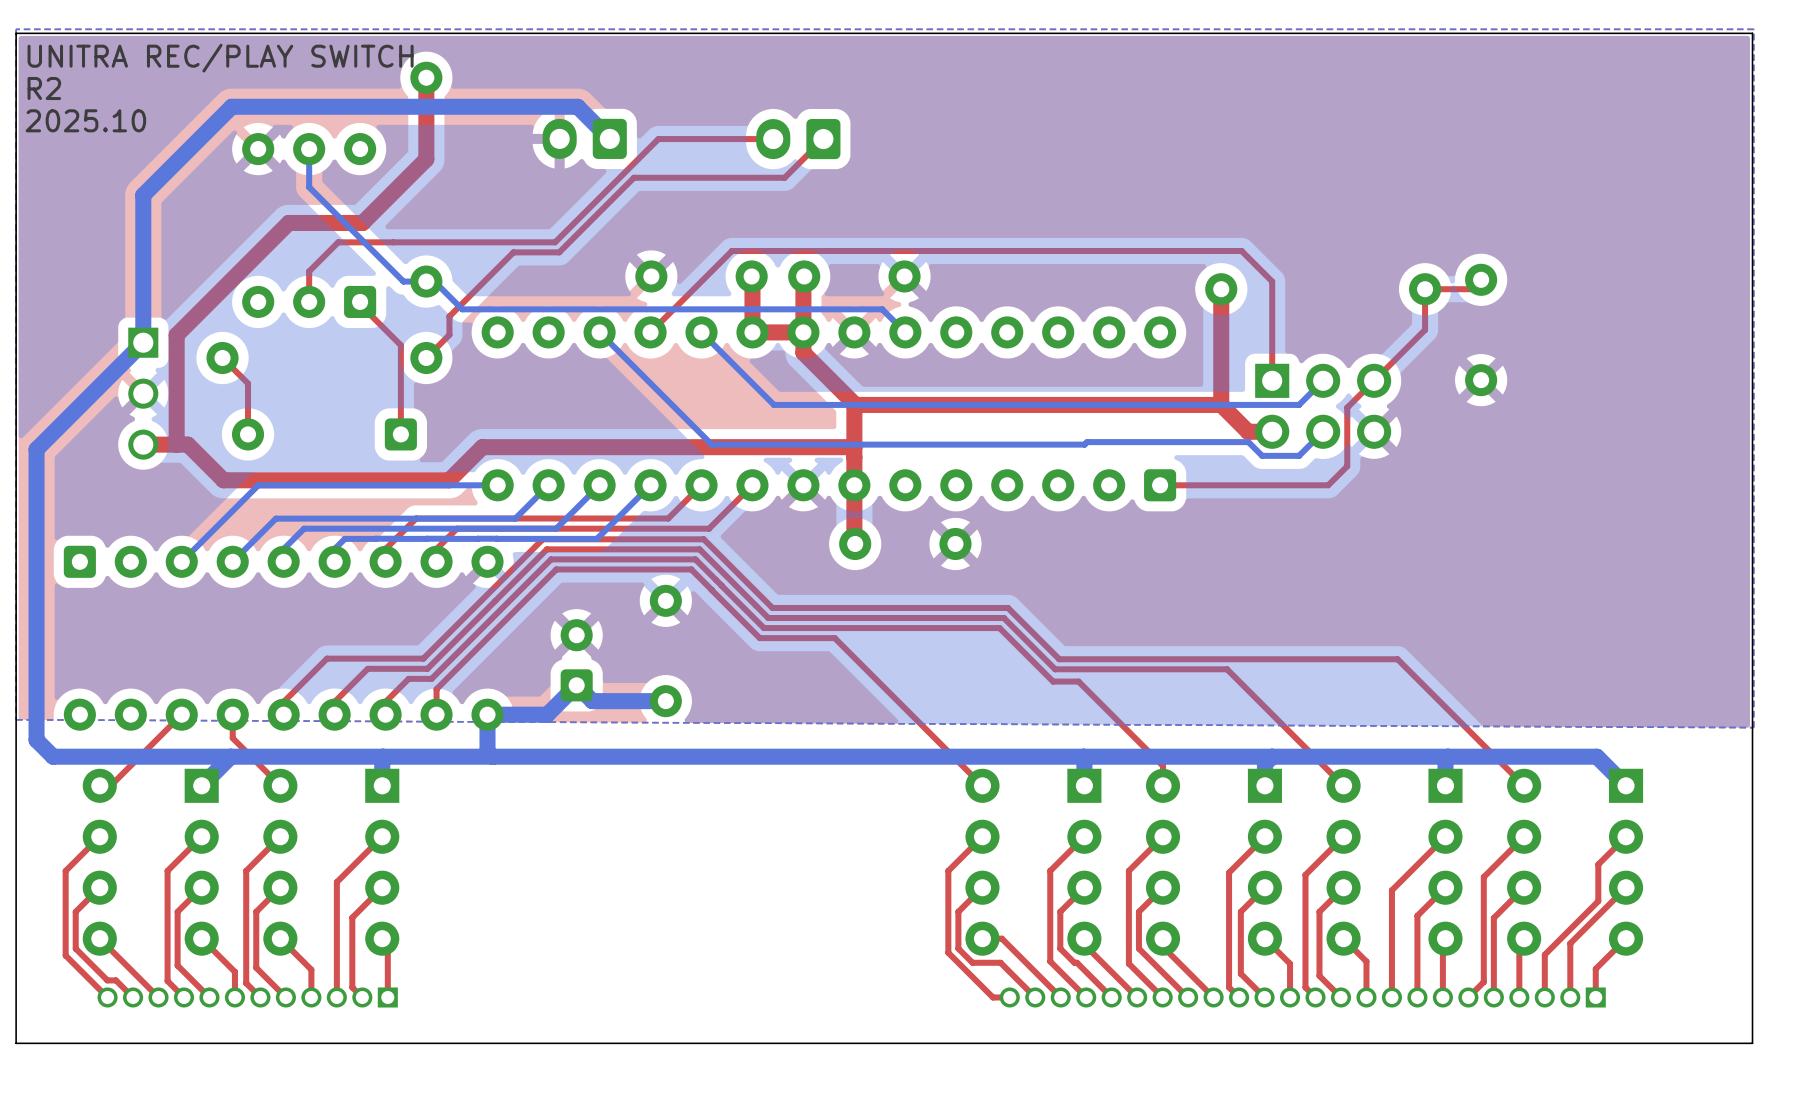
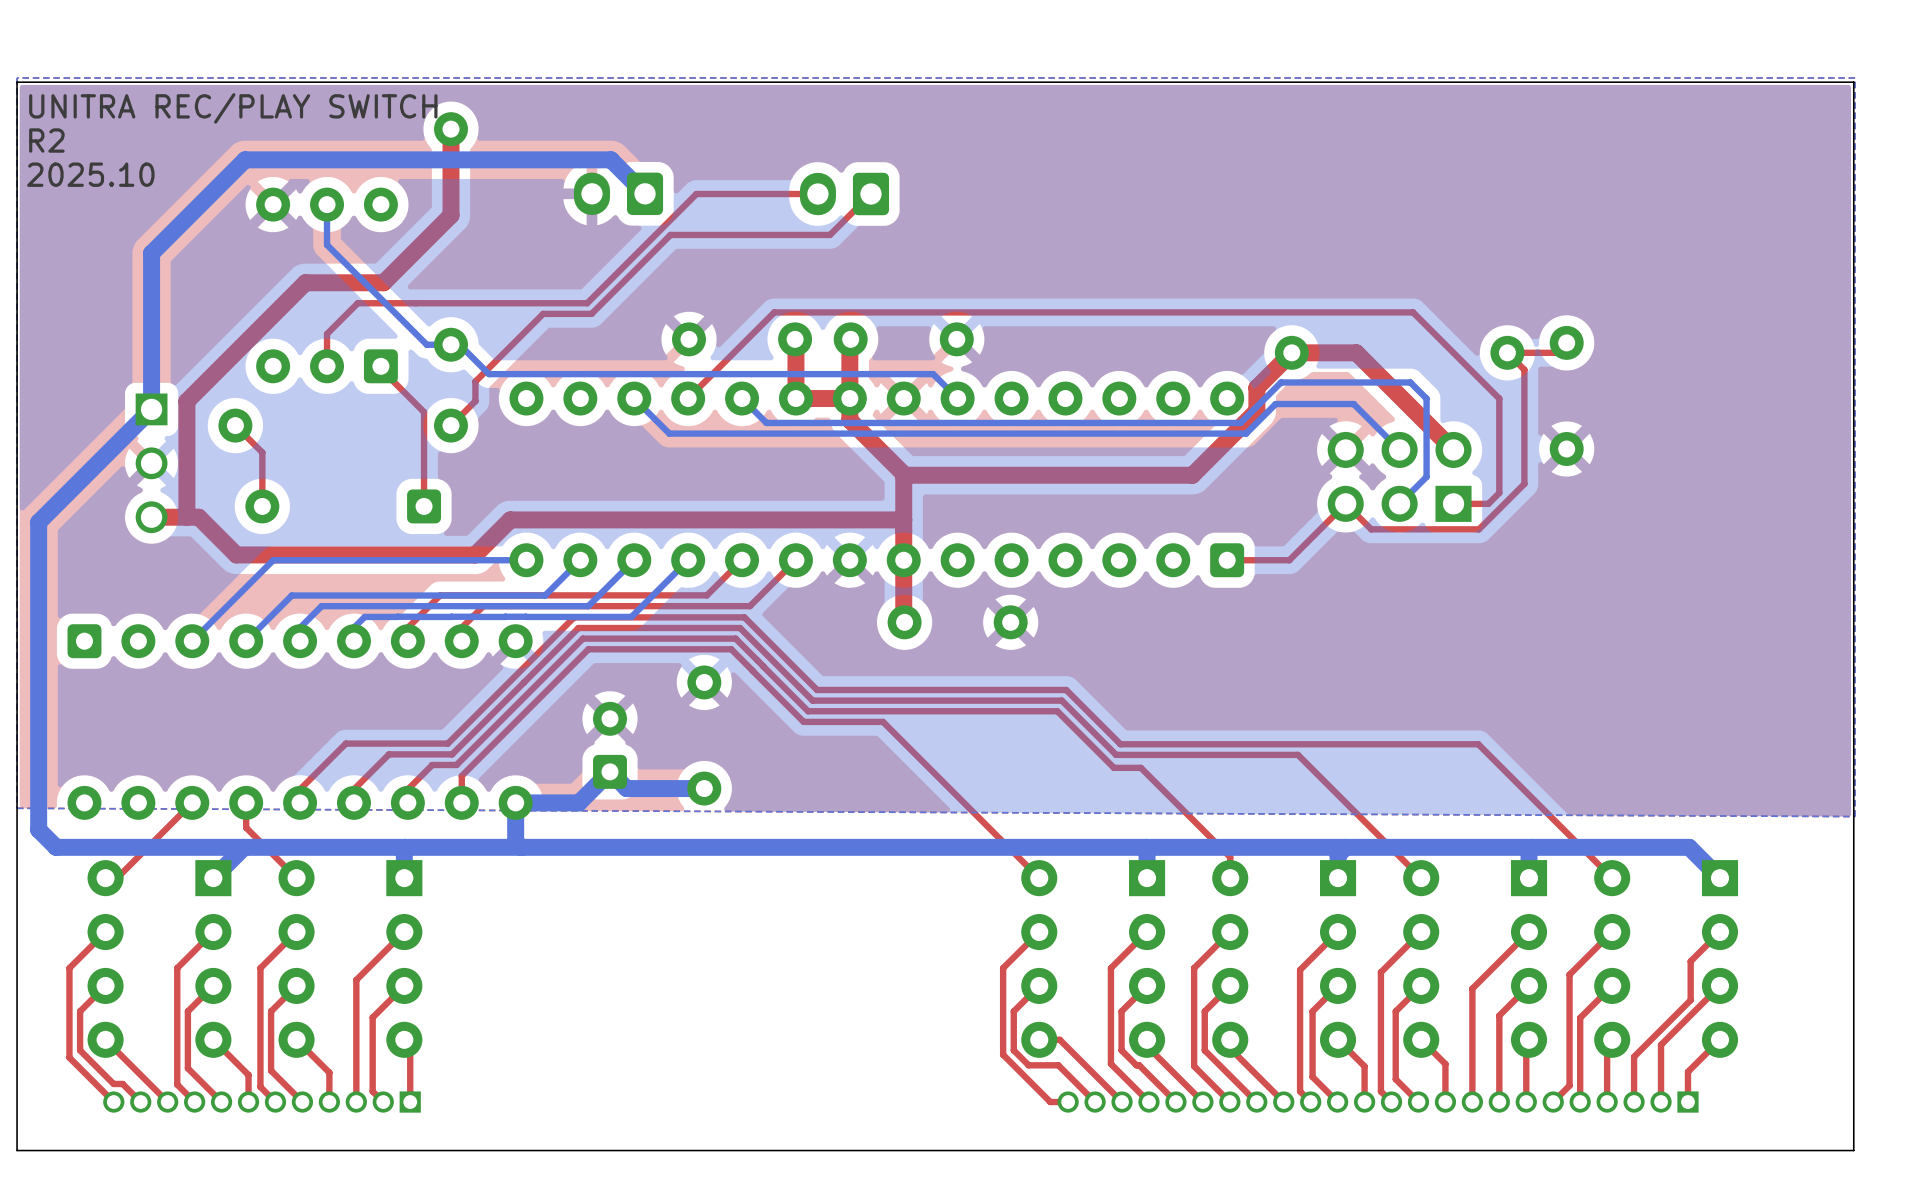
top track: (1241, 250) (1272, 281) (1272, 380) -> (1313, 312) (1413, 312) (1499, 398) (1499, 492) (1488, 503) (1453, 503)
top track: (1221, 289) (1221, 404) -> none
top track: (1425, 289) (1425, 329) (1347, 407) (1347, 466) (1328, 485) (1218, 485) -> (1507, 352) (1524, 369) (1524, 483) (1479, 529) (1371, 529) (1345, 503) (1289, 560)
bottom track: (724, 355) (774, 404) (1299, 404) (1323, 380) -> (766, 422) (1240, 422) (1281, 382) (1410, 382) (1426, 398) (1426, 476) (1399, 503)
bottom track: (632, 365) (711, 444) (1084, 444) (1087, 442) (1248, 442) (1262, 455) (1299, 455) (1323, 431) -> (669, 433) (1246, 433) (1275, 404) (1353, 404) (1399, 449)
top track: (1221, 404) (1127, 404) -> (1453, 449) (1356, 352) (1291, 352) (1256, 387) (1256, 410) (1192, 475)
top track: (1221, 404) (1248, 431) (1272, 431) -> none
part rotation: 0° (1323, 406) -> 180° (1399, 476)

